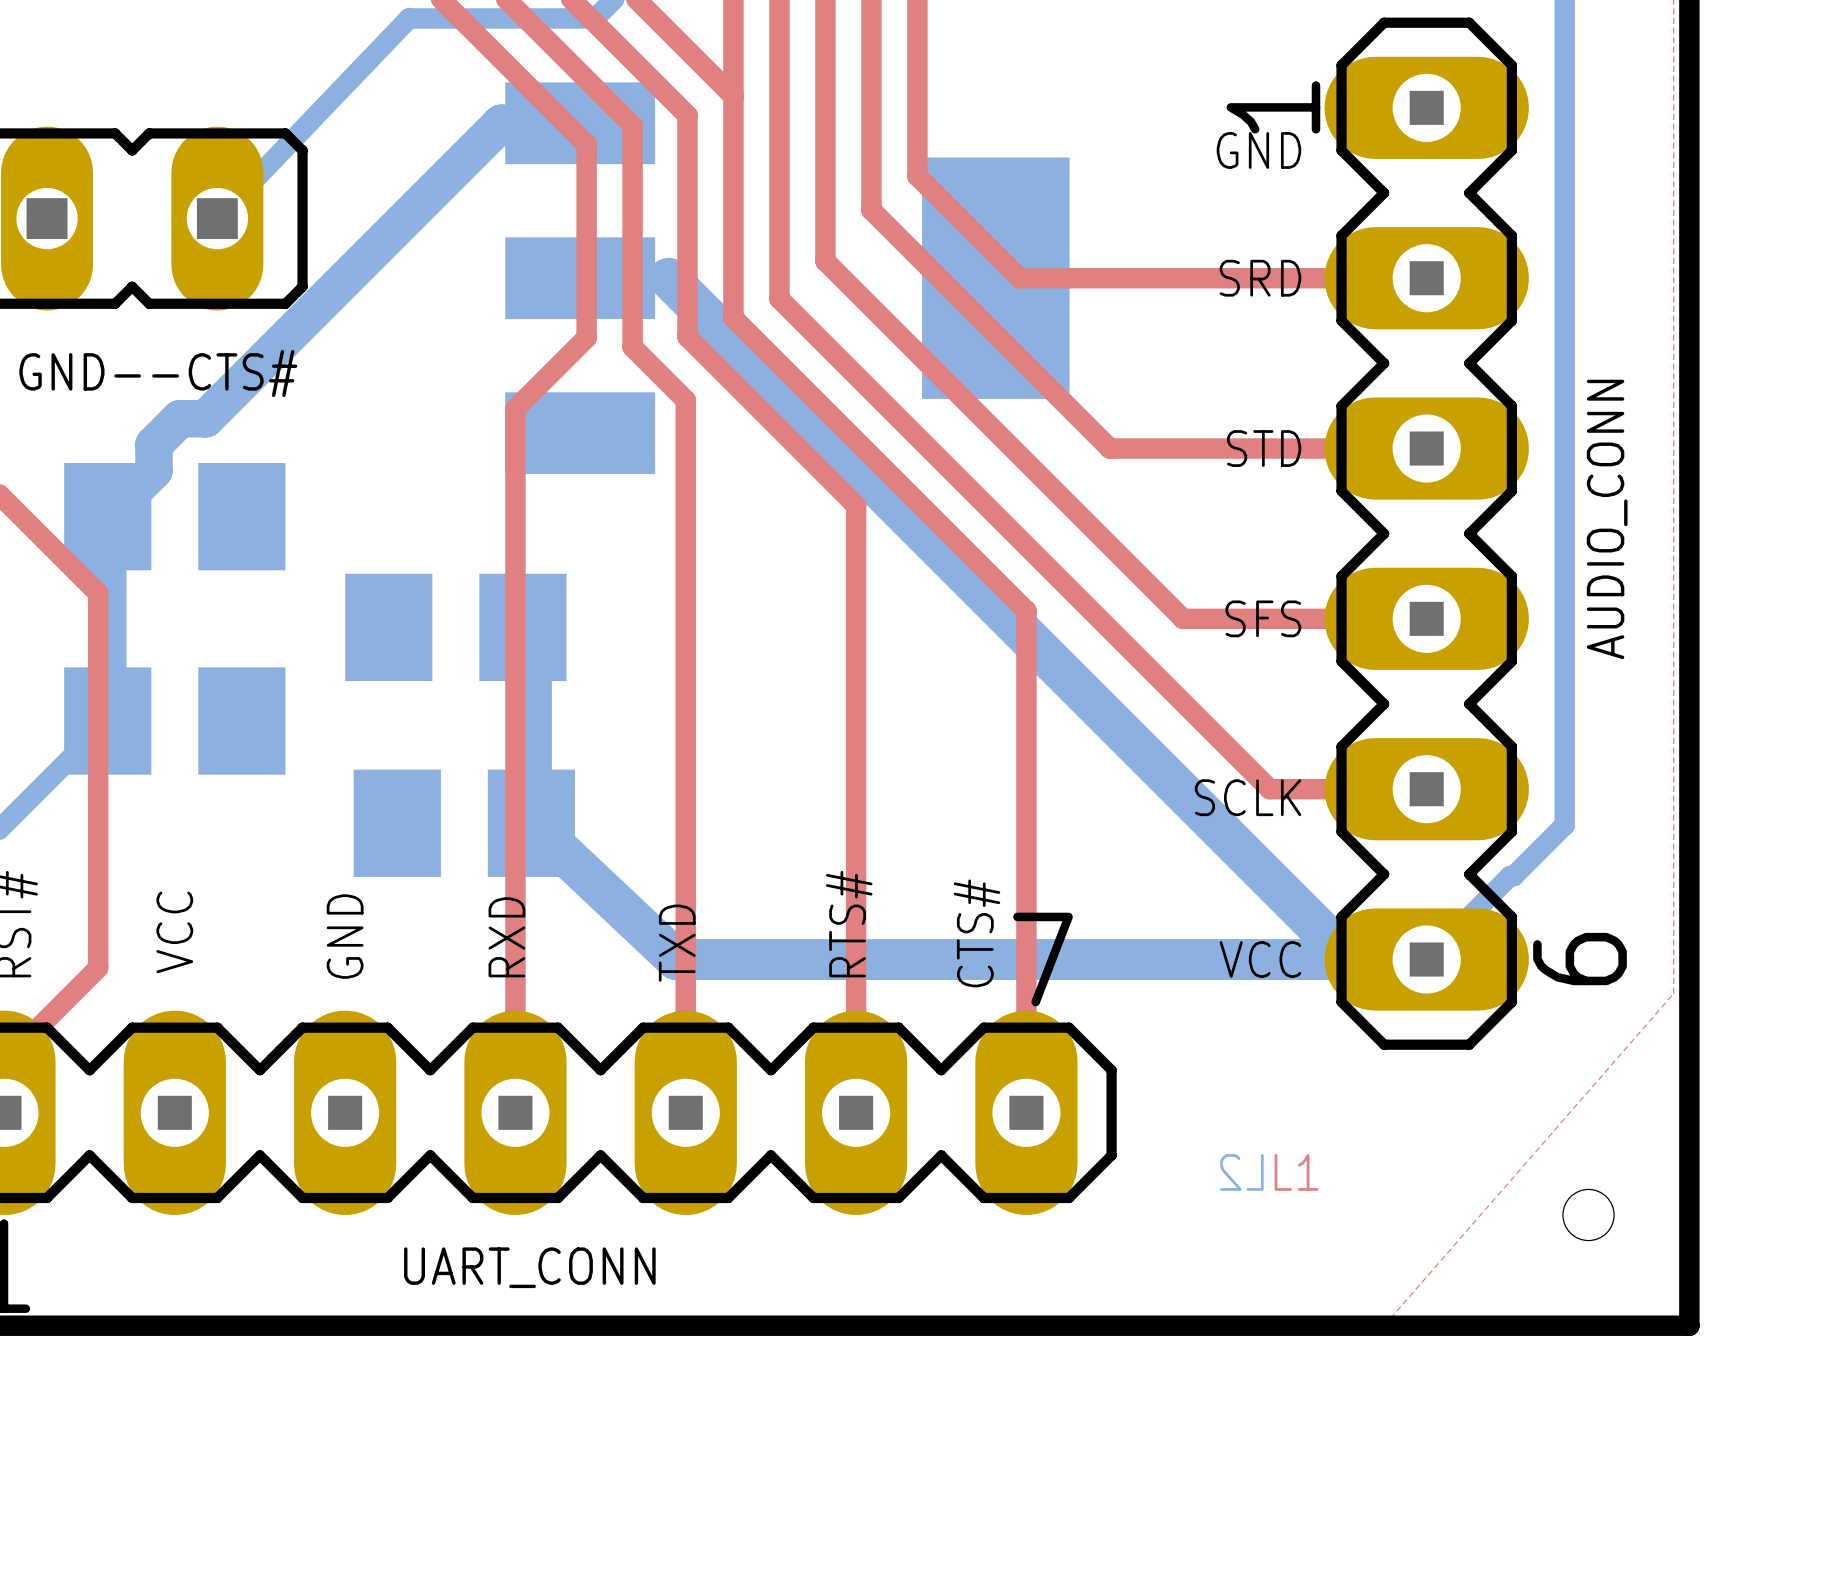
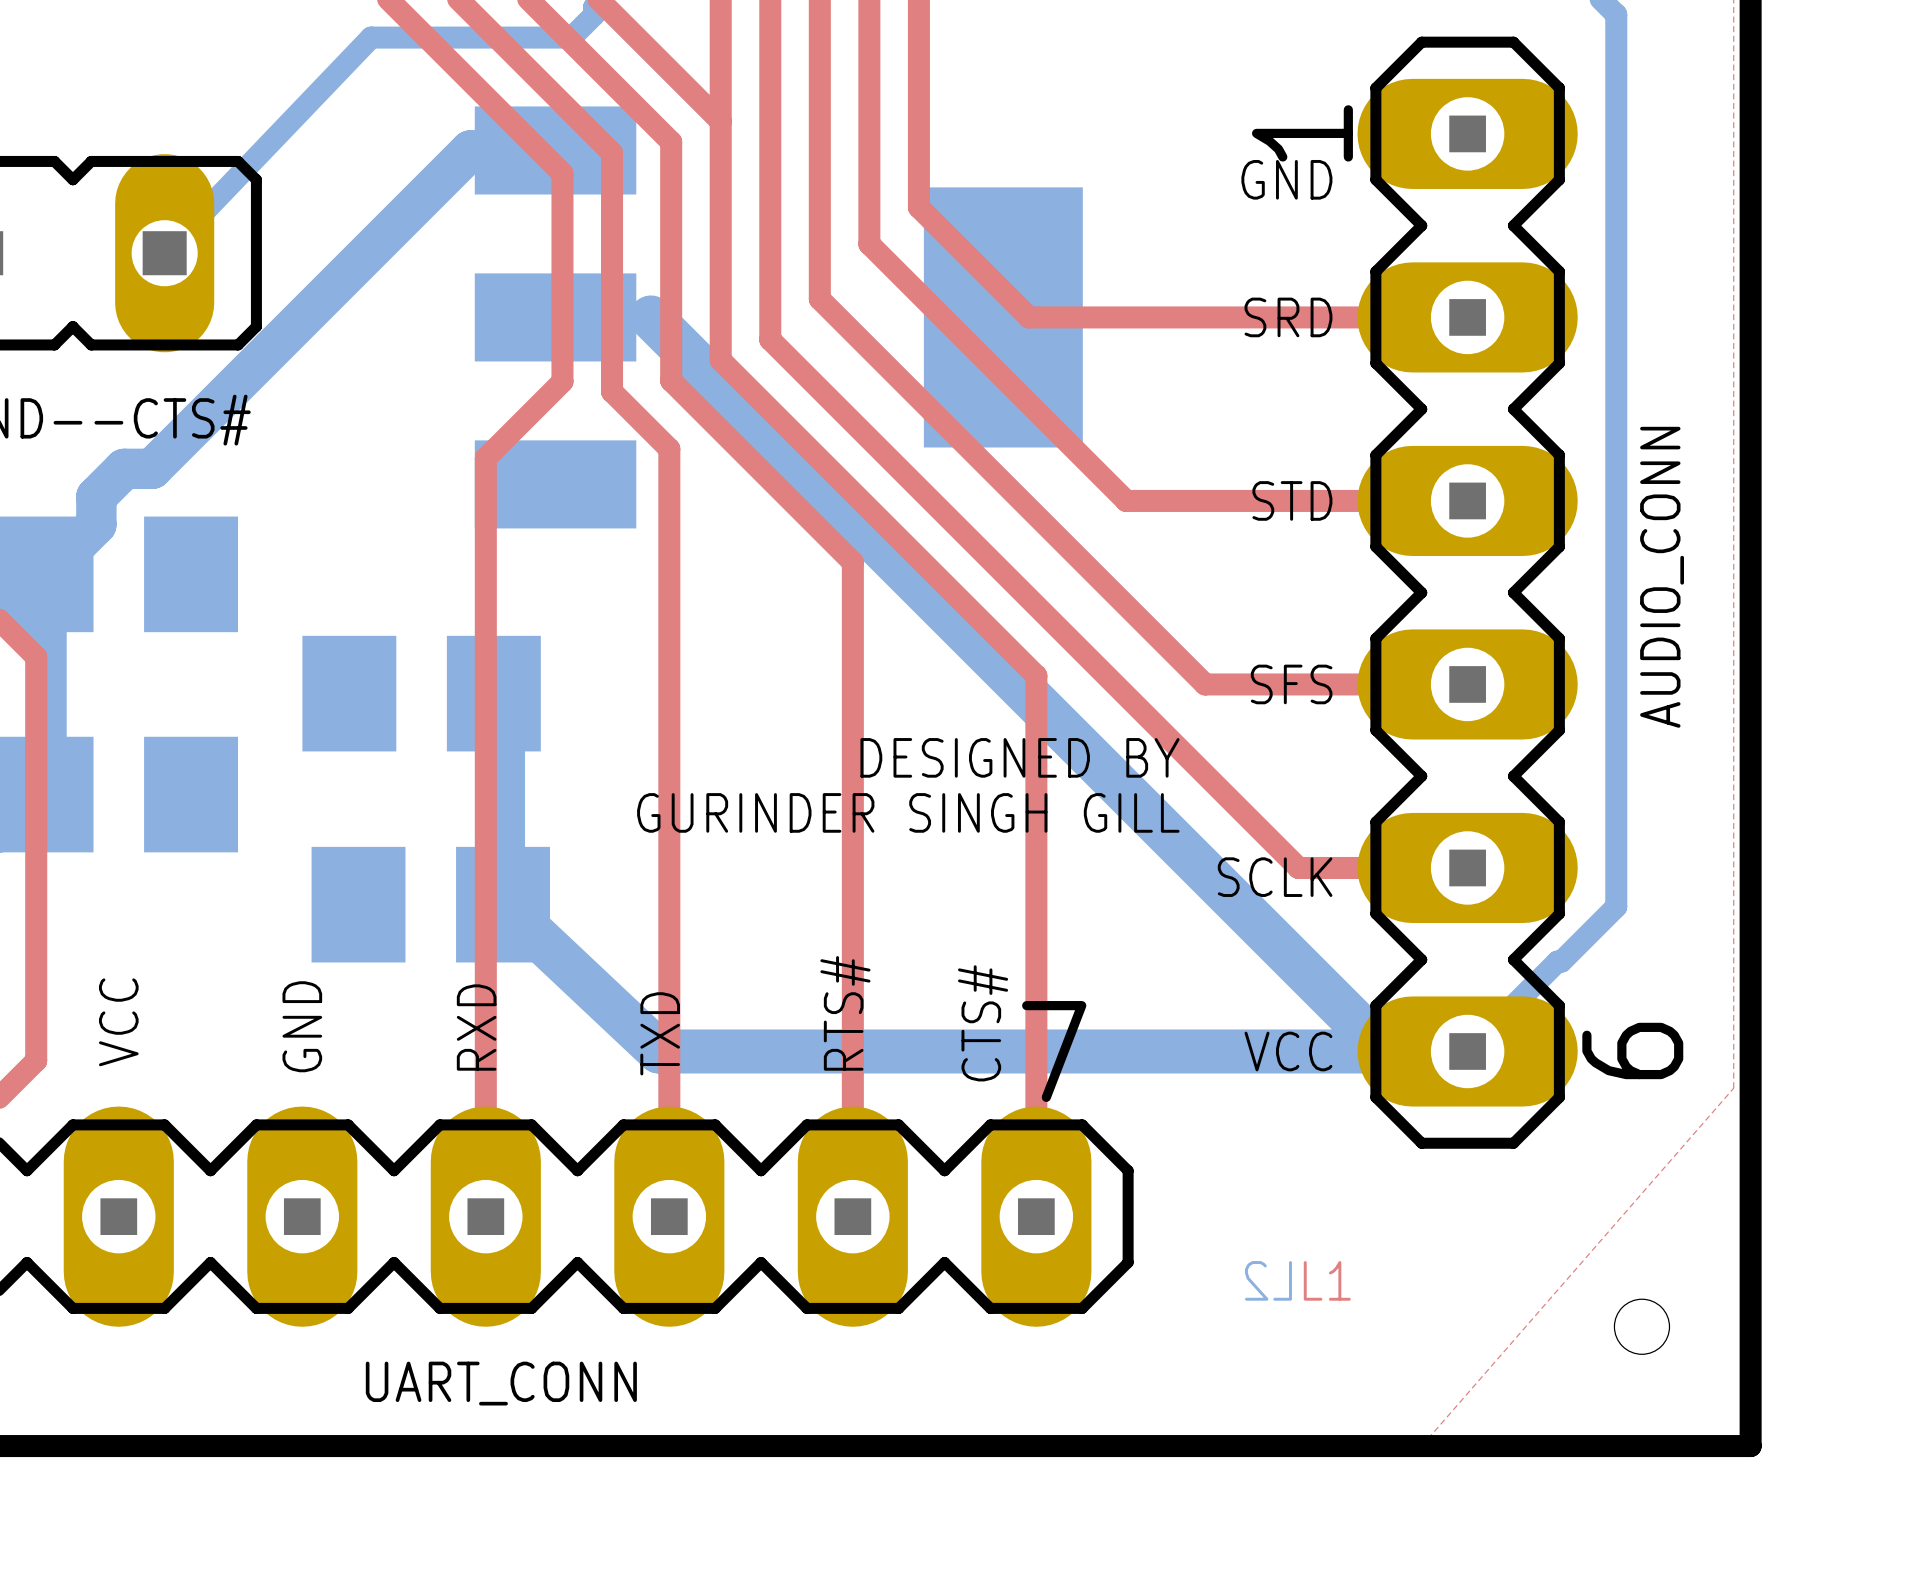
text: none -> DESIGNED BY (1020, 757)
text: none -> GURINDER SINGH GILL (908, 812)

